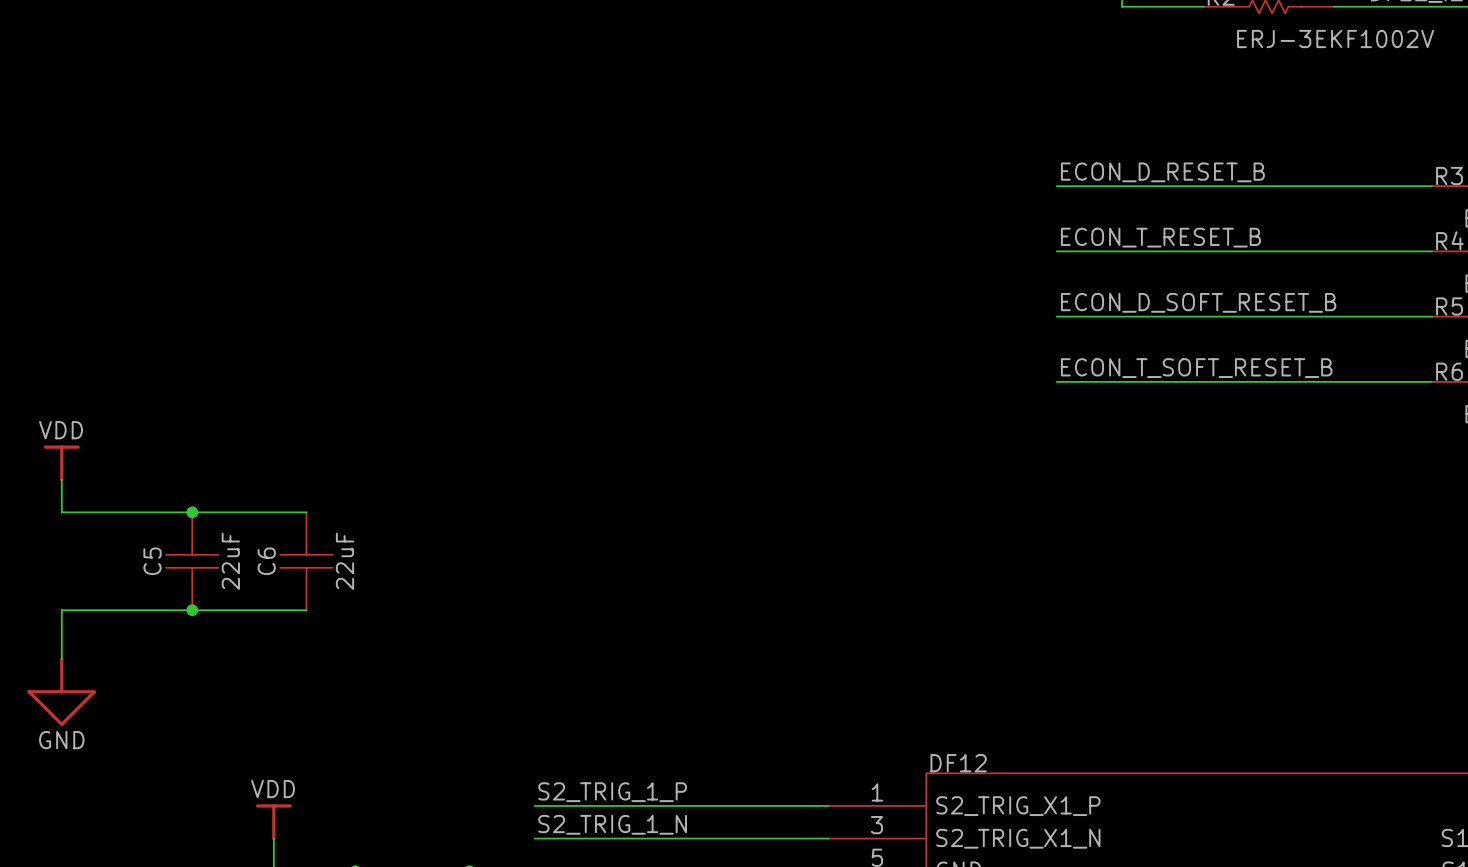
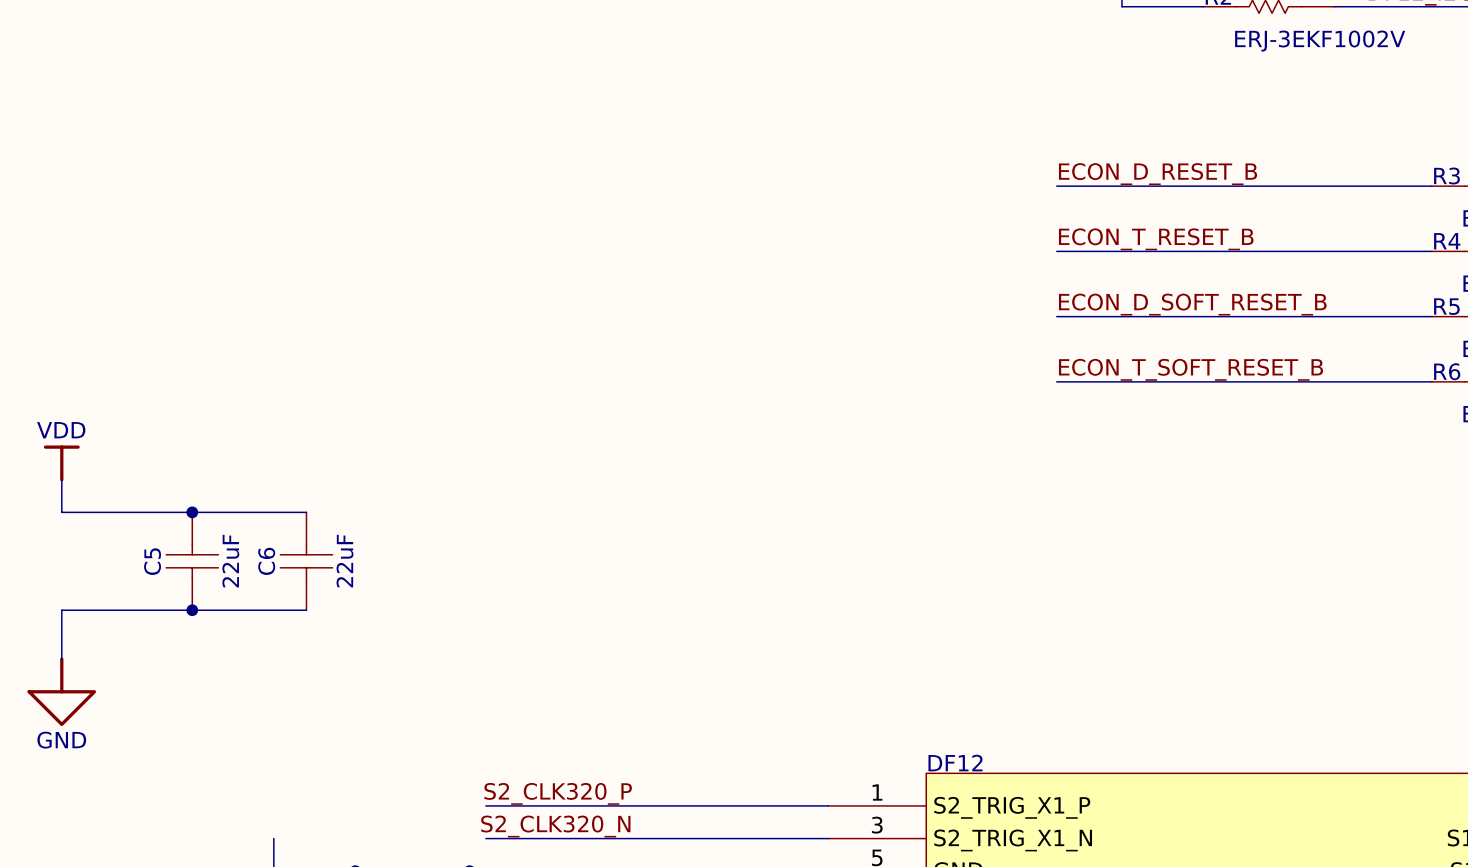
label: none -> S2_CLK320_P (558, 793)
label: S2_TRIG_1_P (612, 792) -> none
wire: none -> (485, 805) (534, 805)
power symbol: VDD (273, 822) -> none
label: none -> S2_CLK320_N (555, 826)
label: S2_TRIG_1_N (612, 824) -> none
wire: none -> (485, 838) (534, 838)

